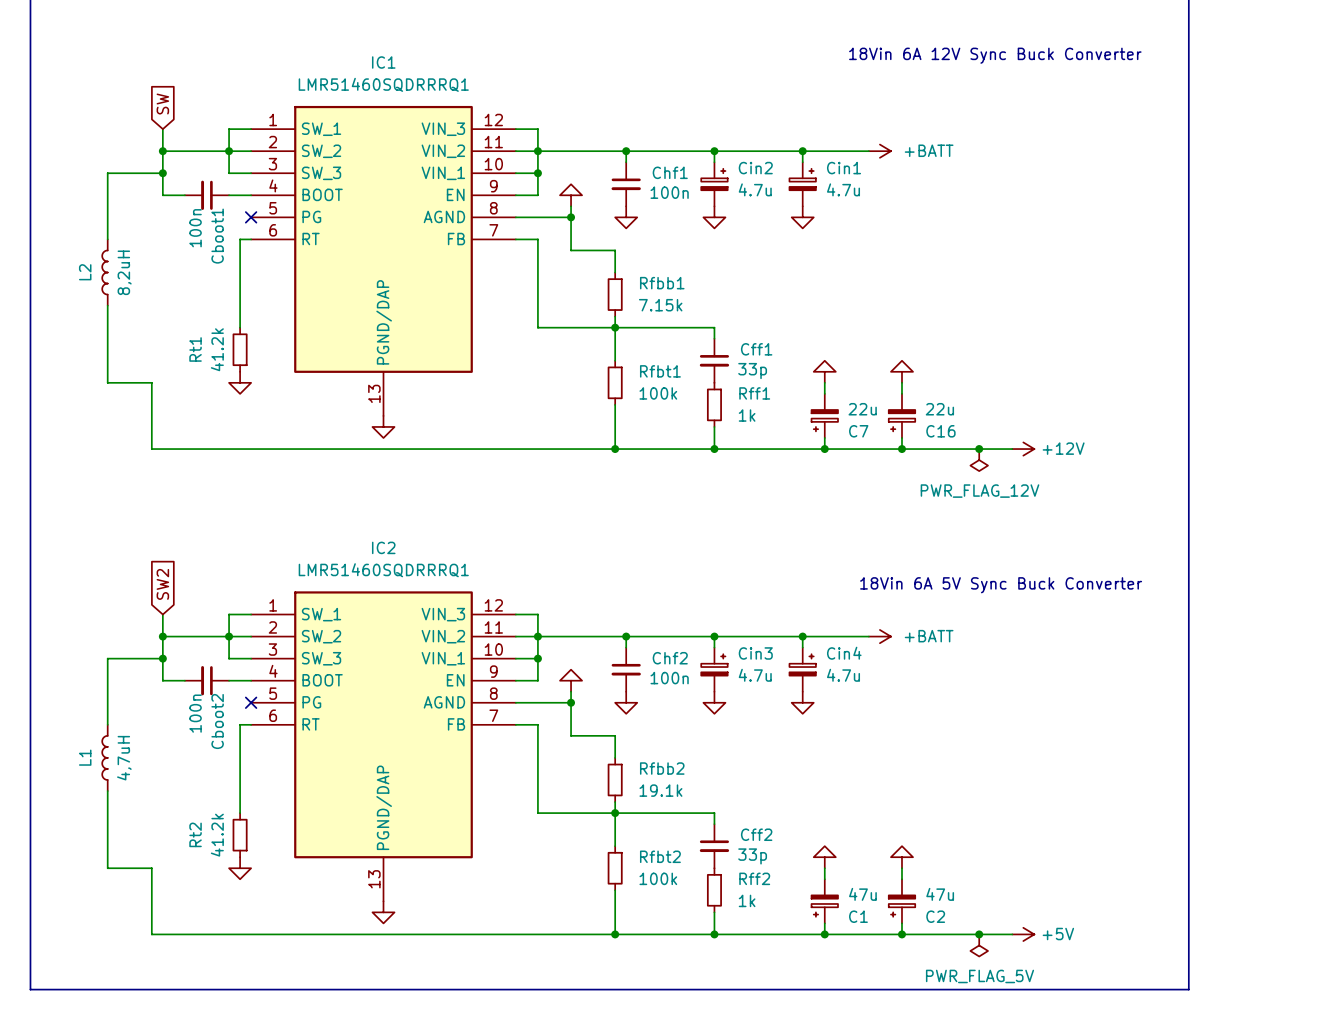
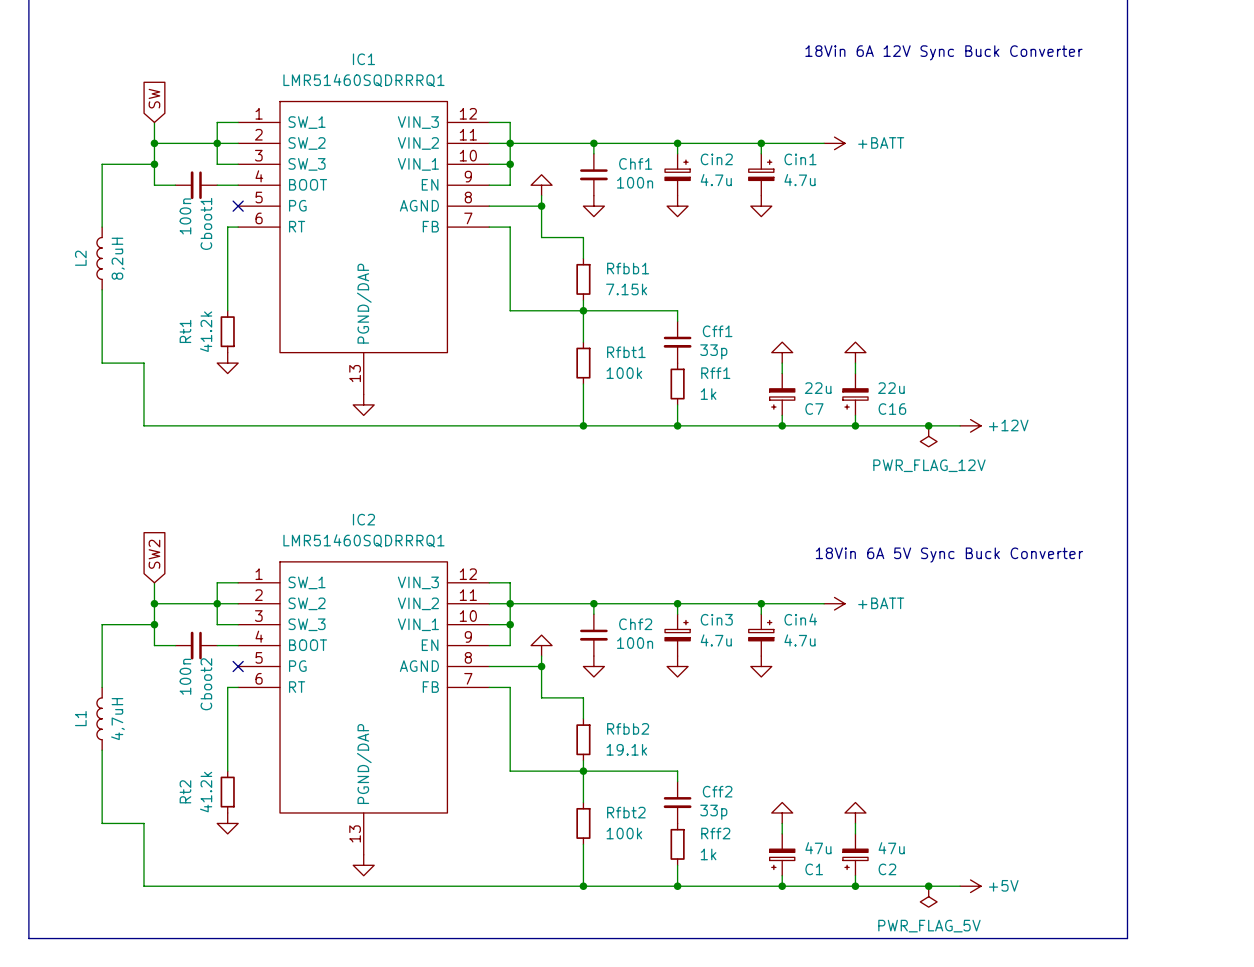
IC1 symbol: [251, 105, 516, 416] -> [238, 100, 490, 395]
IC2 symbol: [251, 591, 516, 902] -> [238, 561, 490, 855]

